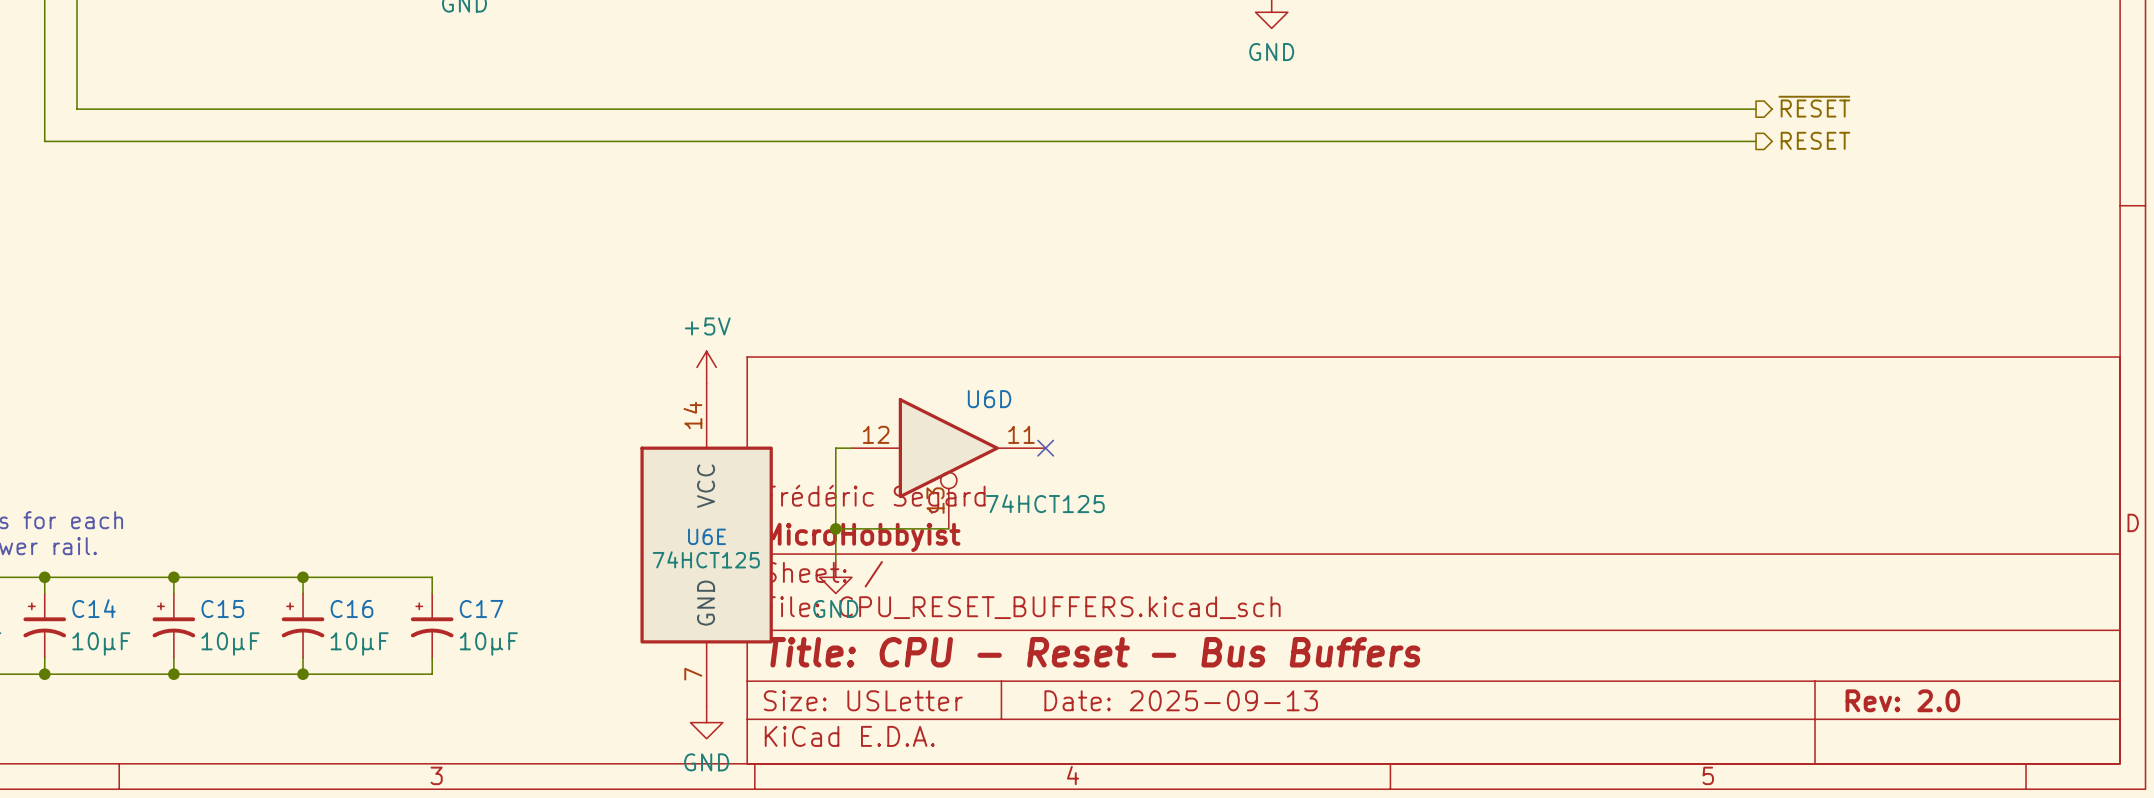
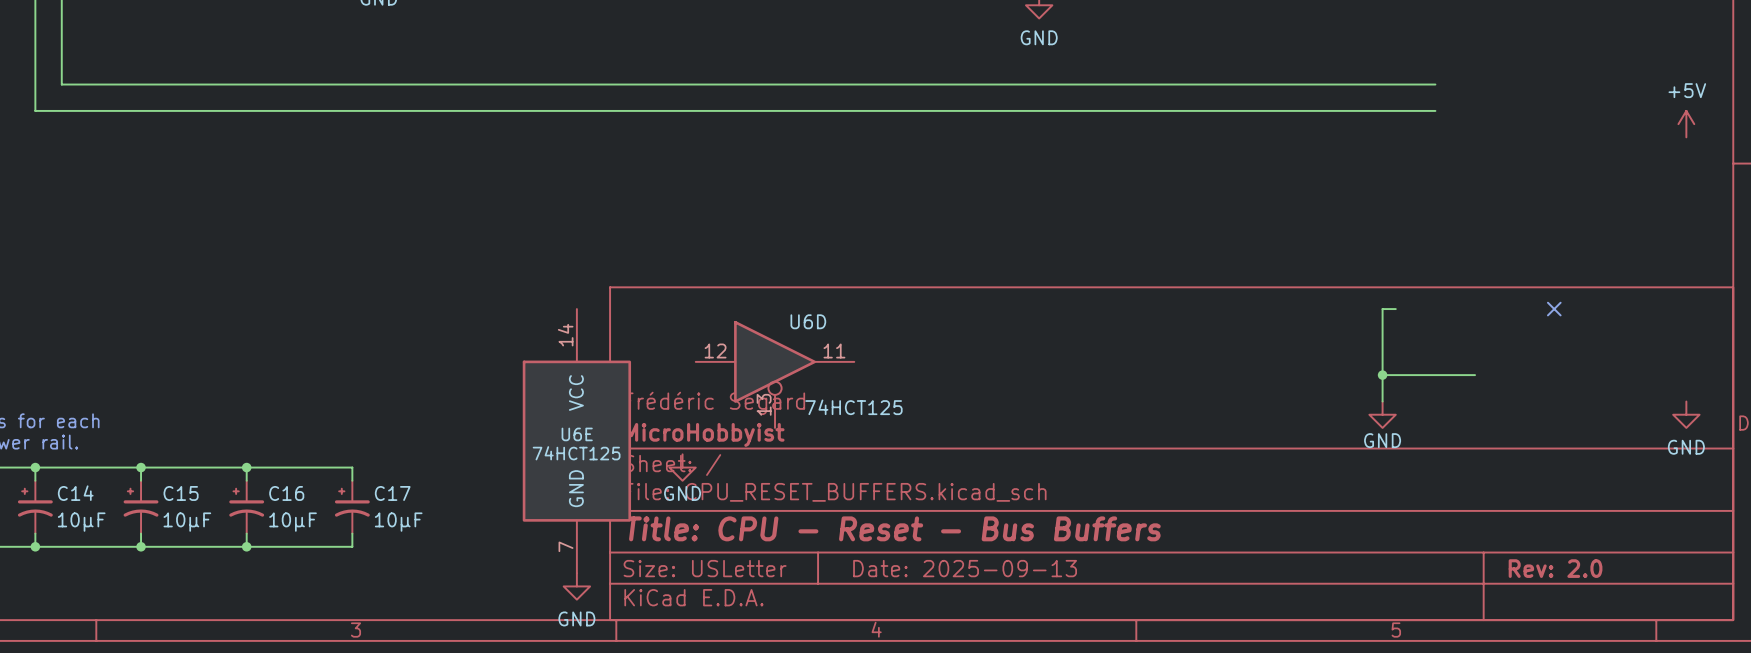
hierarchical label: ~{RESET} (1814, 106) -> none
hierarchical label: RESET (1815, 140) -> none
power symbol: none -> +5V (1686, 124)
power symbol: +5V (706, 367) -> none
wire: none -> (1395, 309) (1382, 309) (1382, 401)
no-connect mark: none -> (1554, 309)
wire: (851, 448) (835, 448) (835, 561) -> none
no-connect mark: (1045, 448) -> none
wire: none -> (1382, 375) (1475, 375)
junction: none -> (1382, 375)
power symbol: none -> GND (1382, 414)
power symbol: none -> GND (1686, 414)
wire: (835, 528) (948, 528) -> none
junction: (835, 528) -> none

